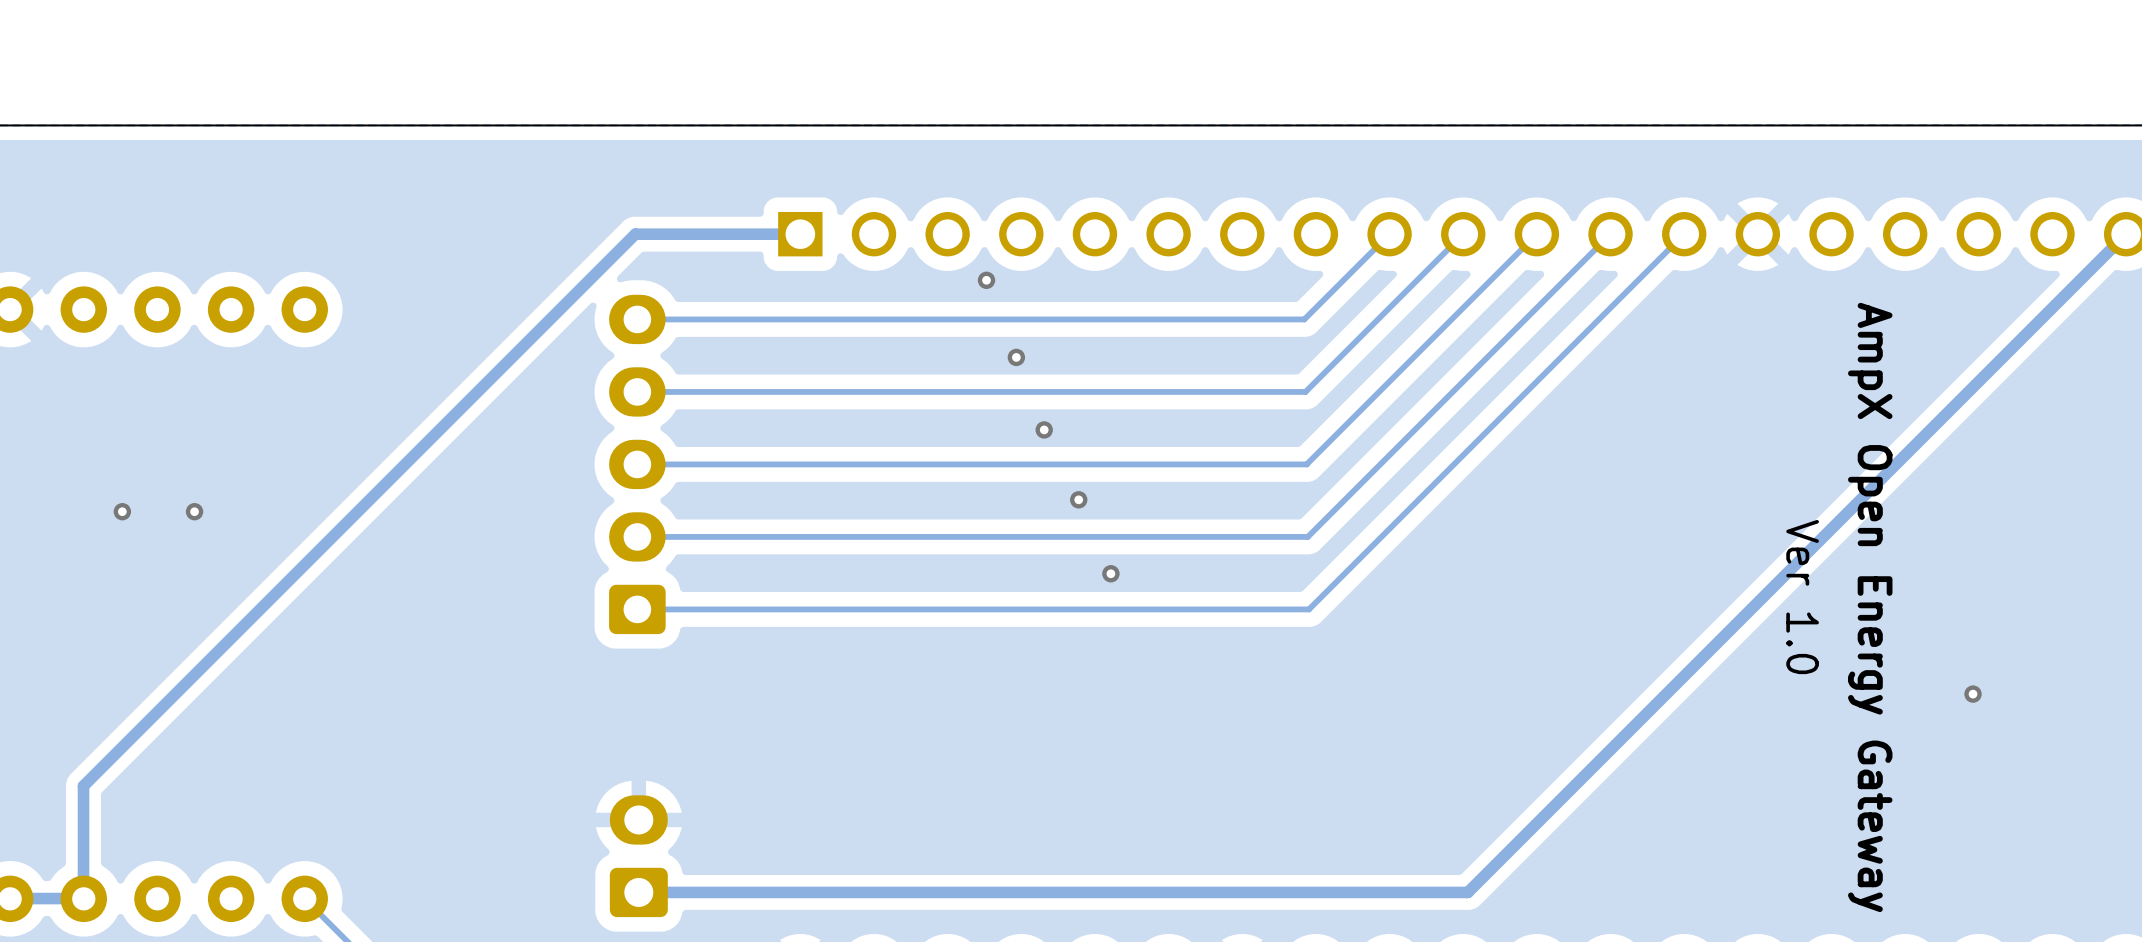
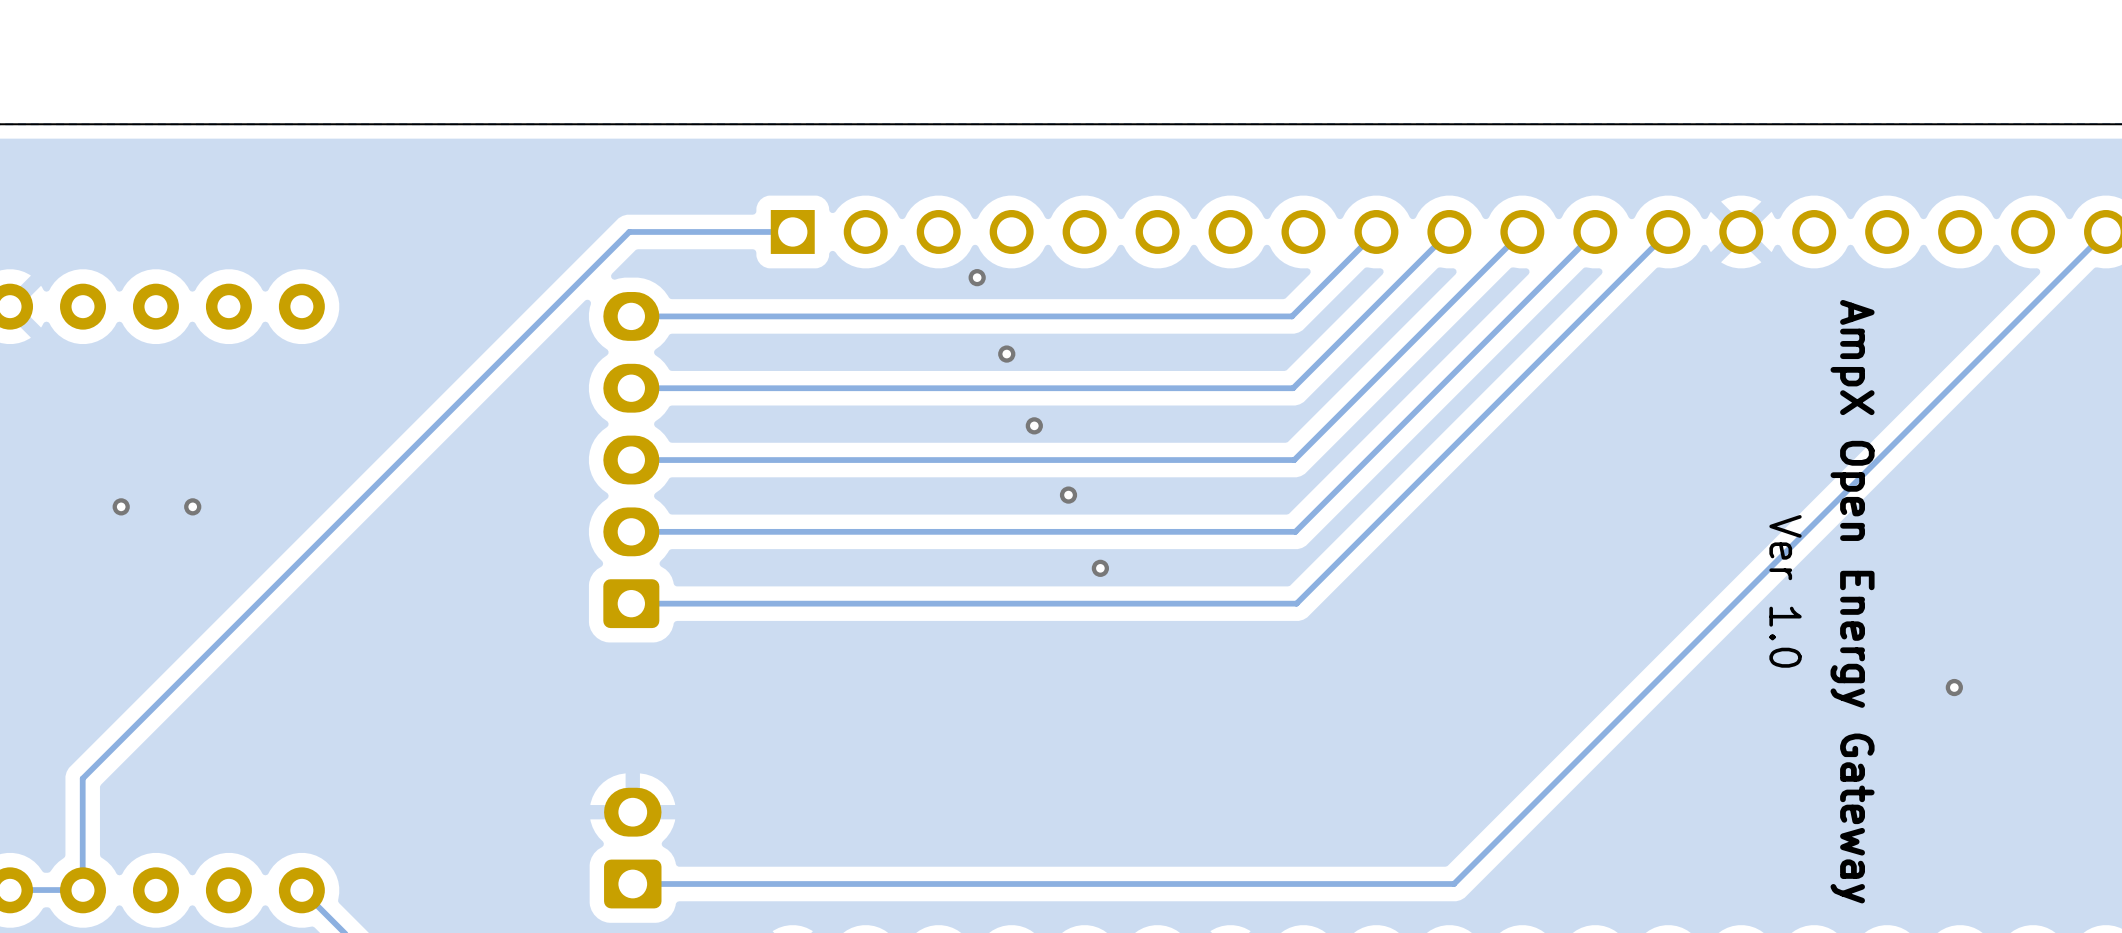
track width: thick (800, 234) (635, 234) (83, 786) (83, 898) (15, 898) -> thin (792, 231) (629, 231) (82, 778) (82, 890) (15, 890)
track width: thick (2126, 234) (1467, 892) (638, 892) -> thin (2106, 231) (1453, 884) (632, 884)

